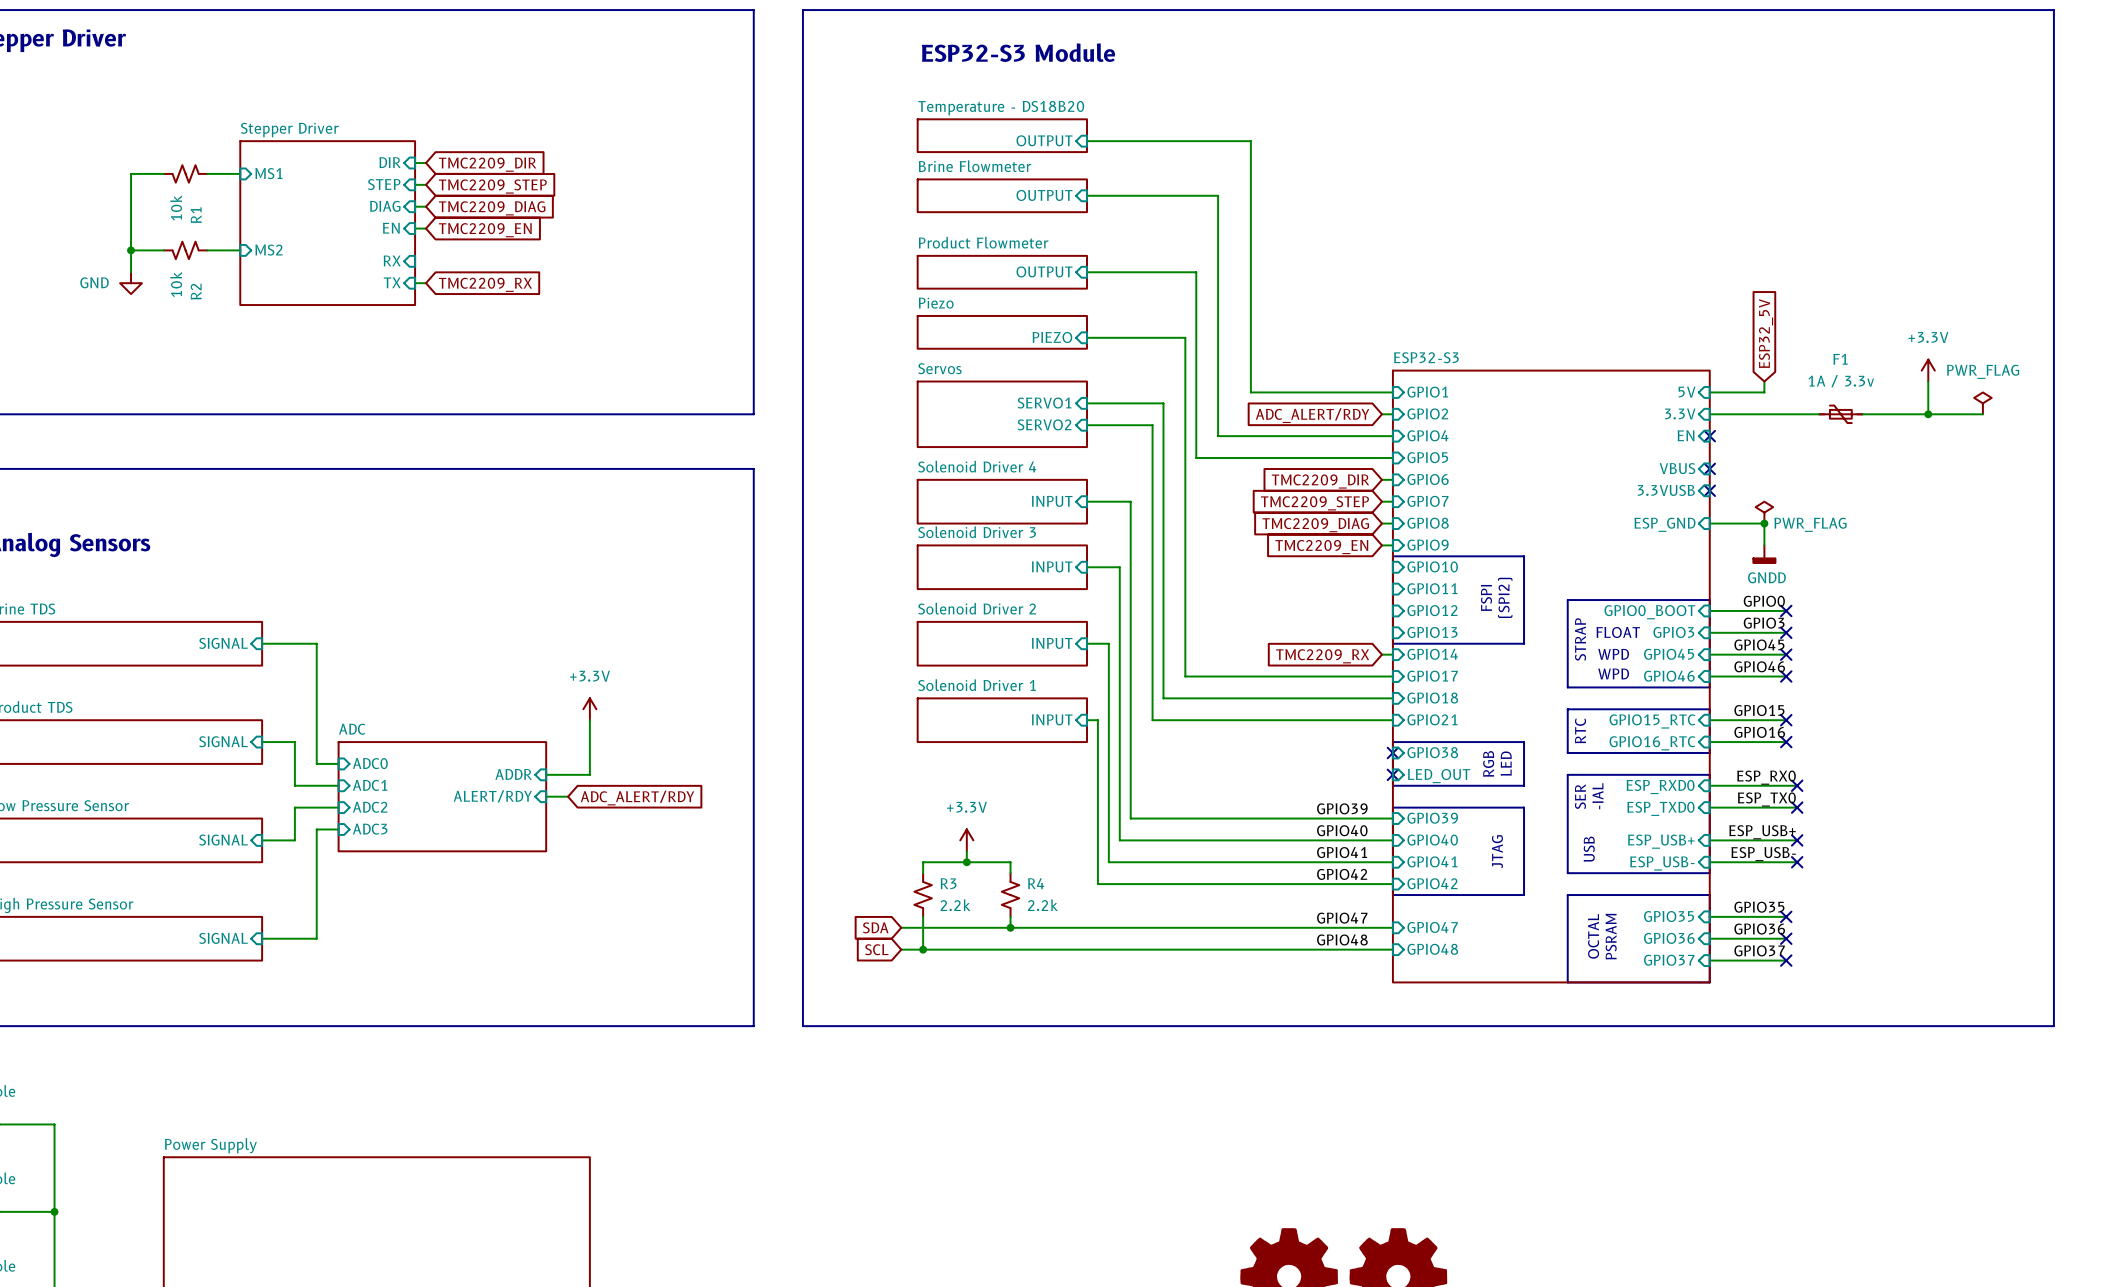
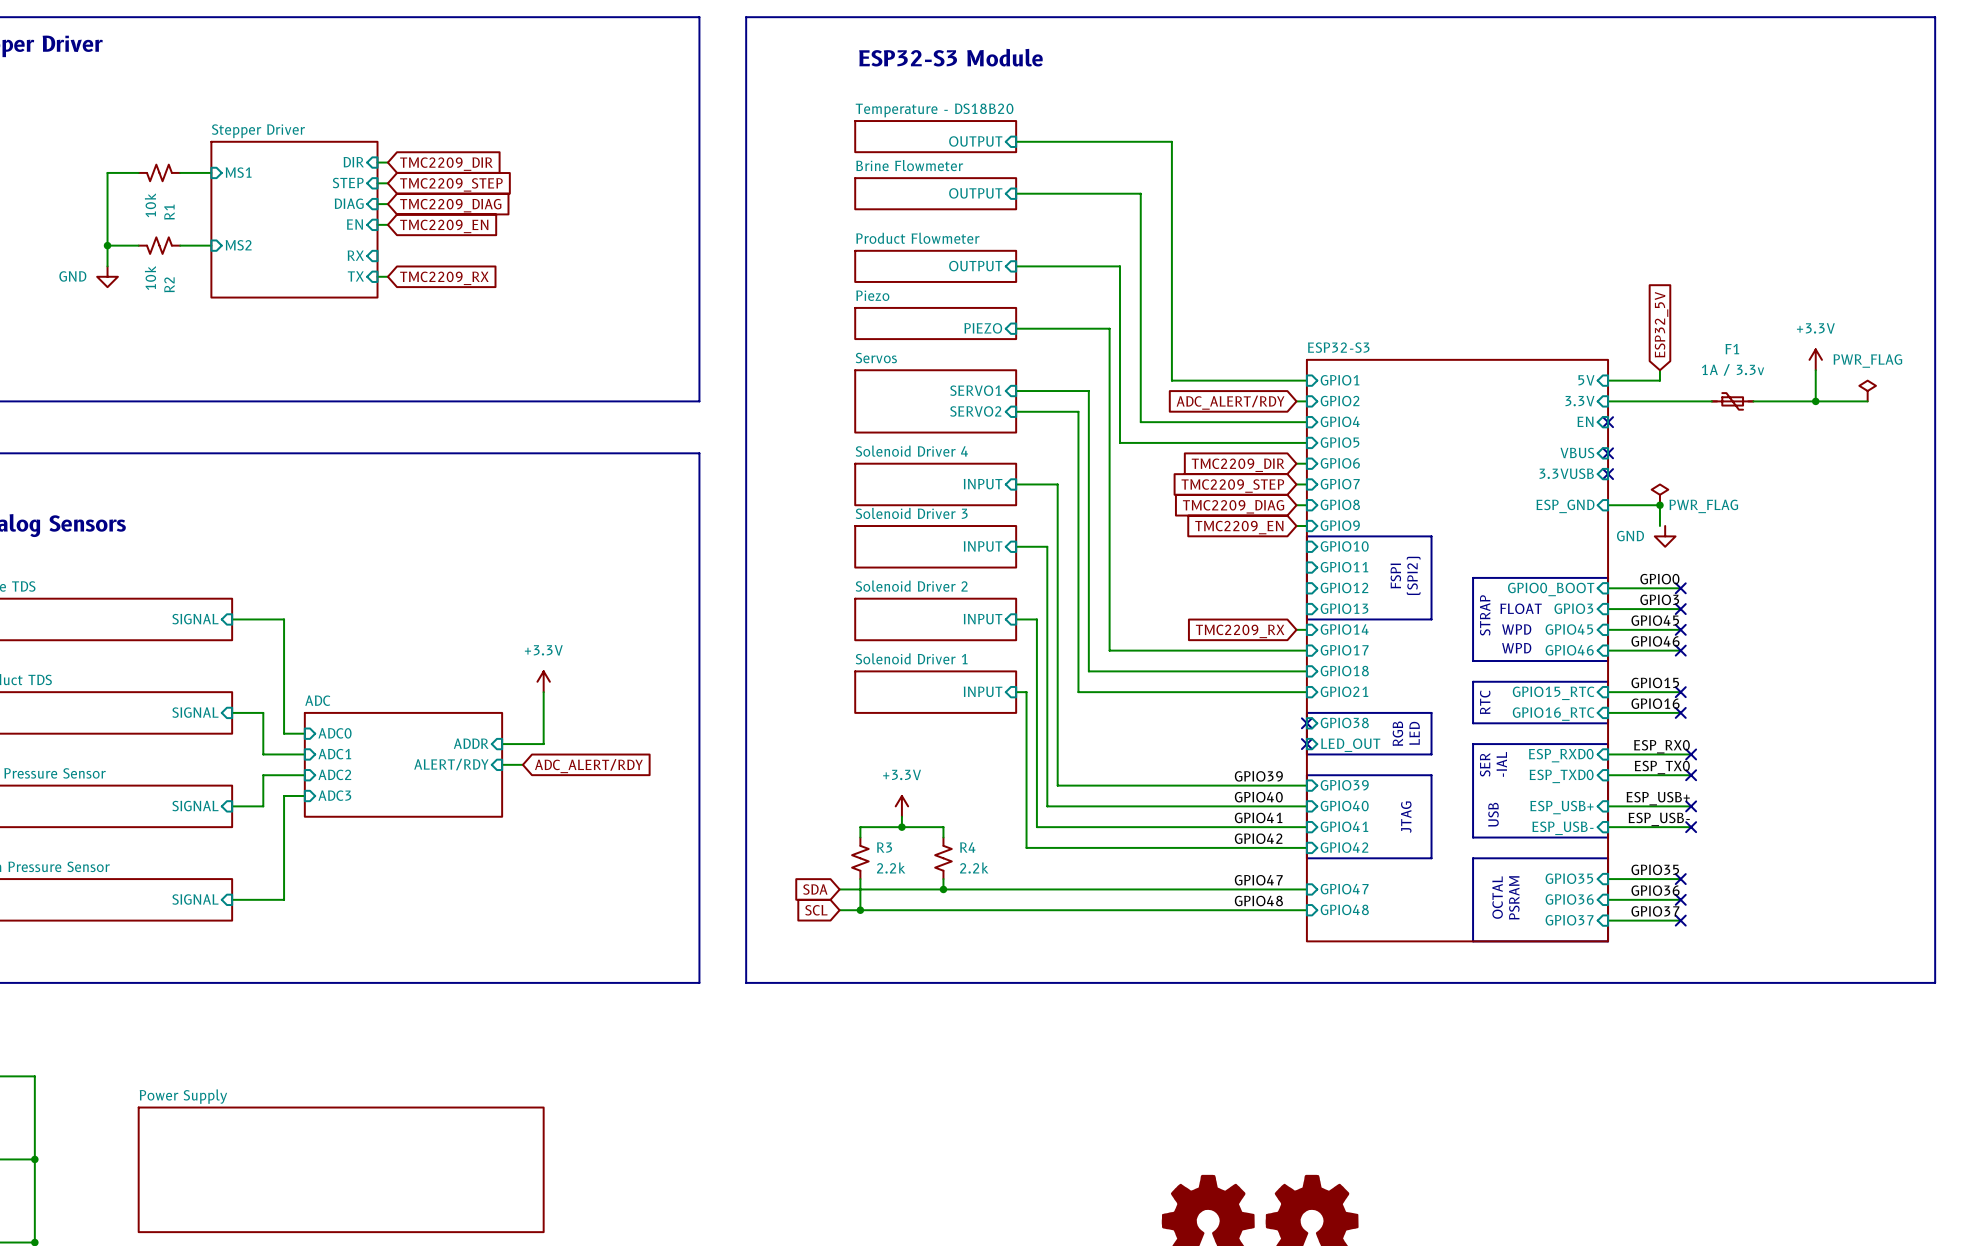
power symbol: GNDD (1764, 554) -> GND (1665, 536)

